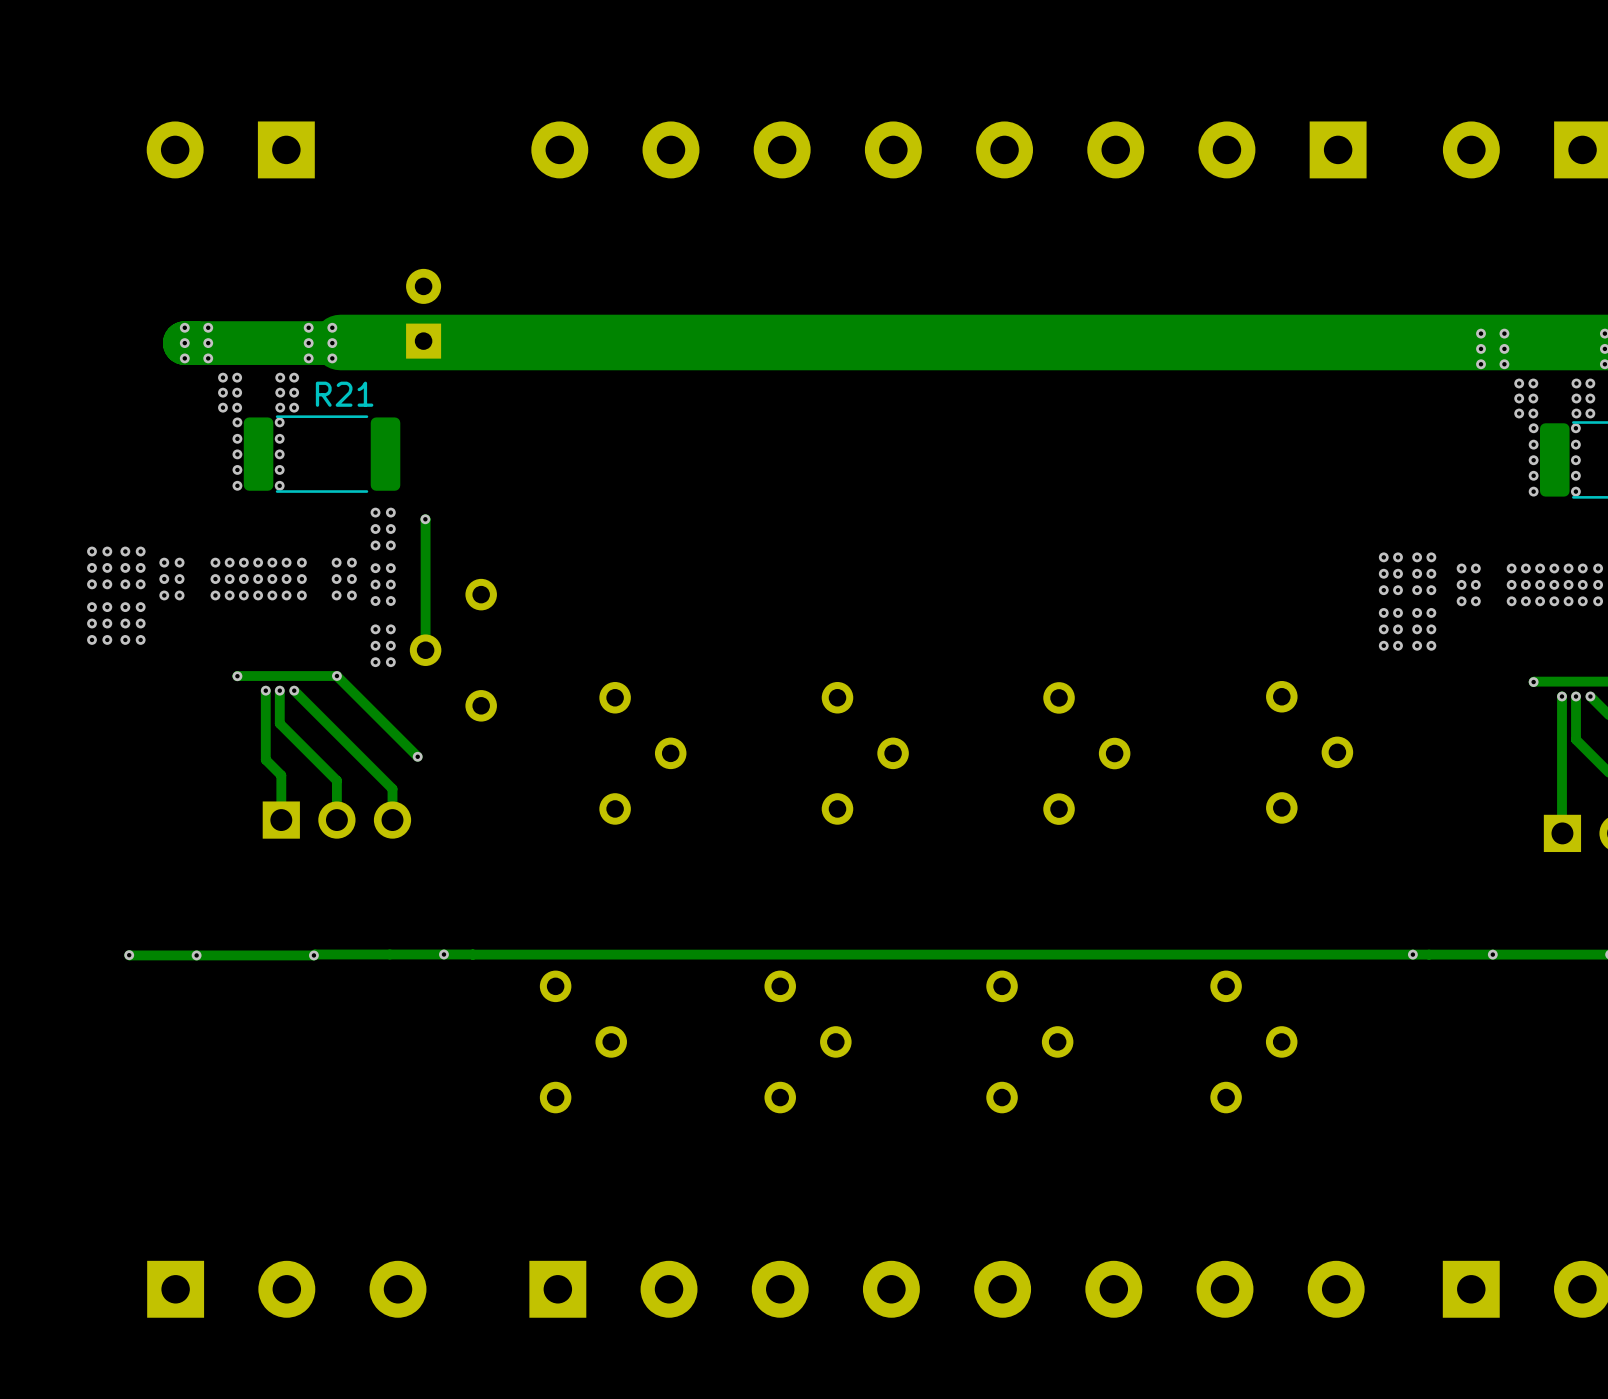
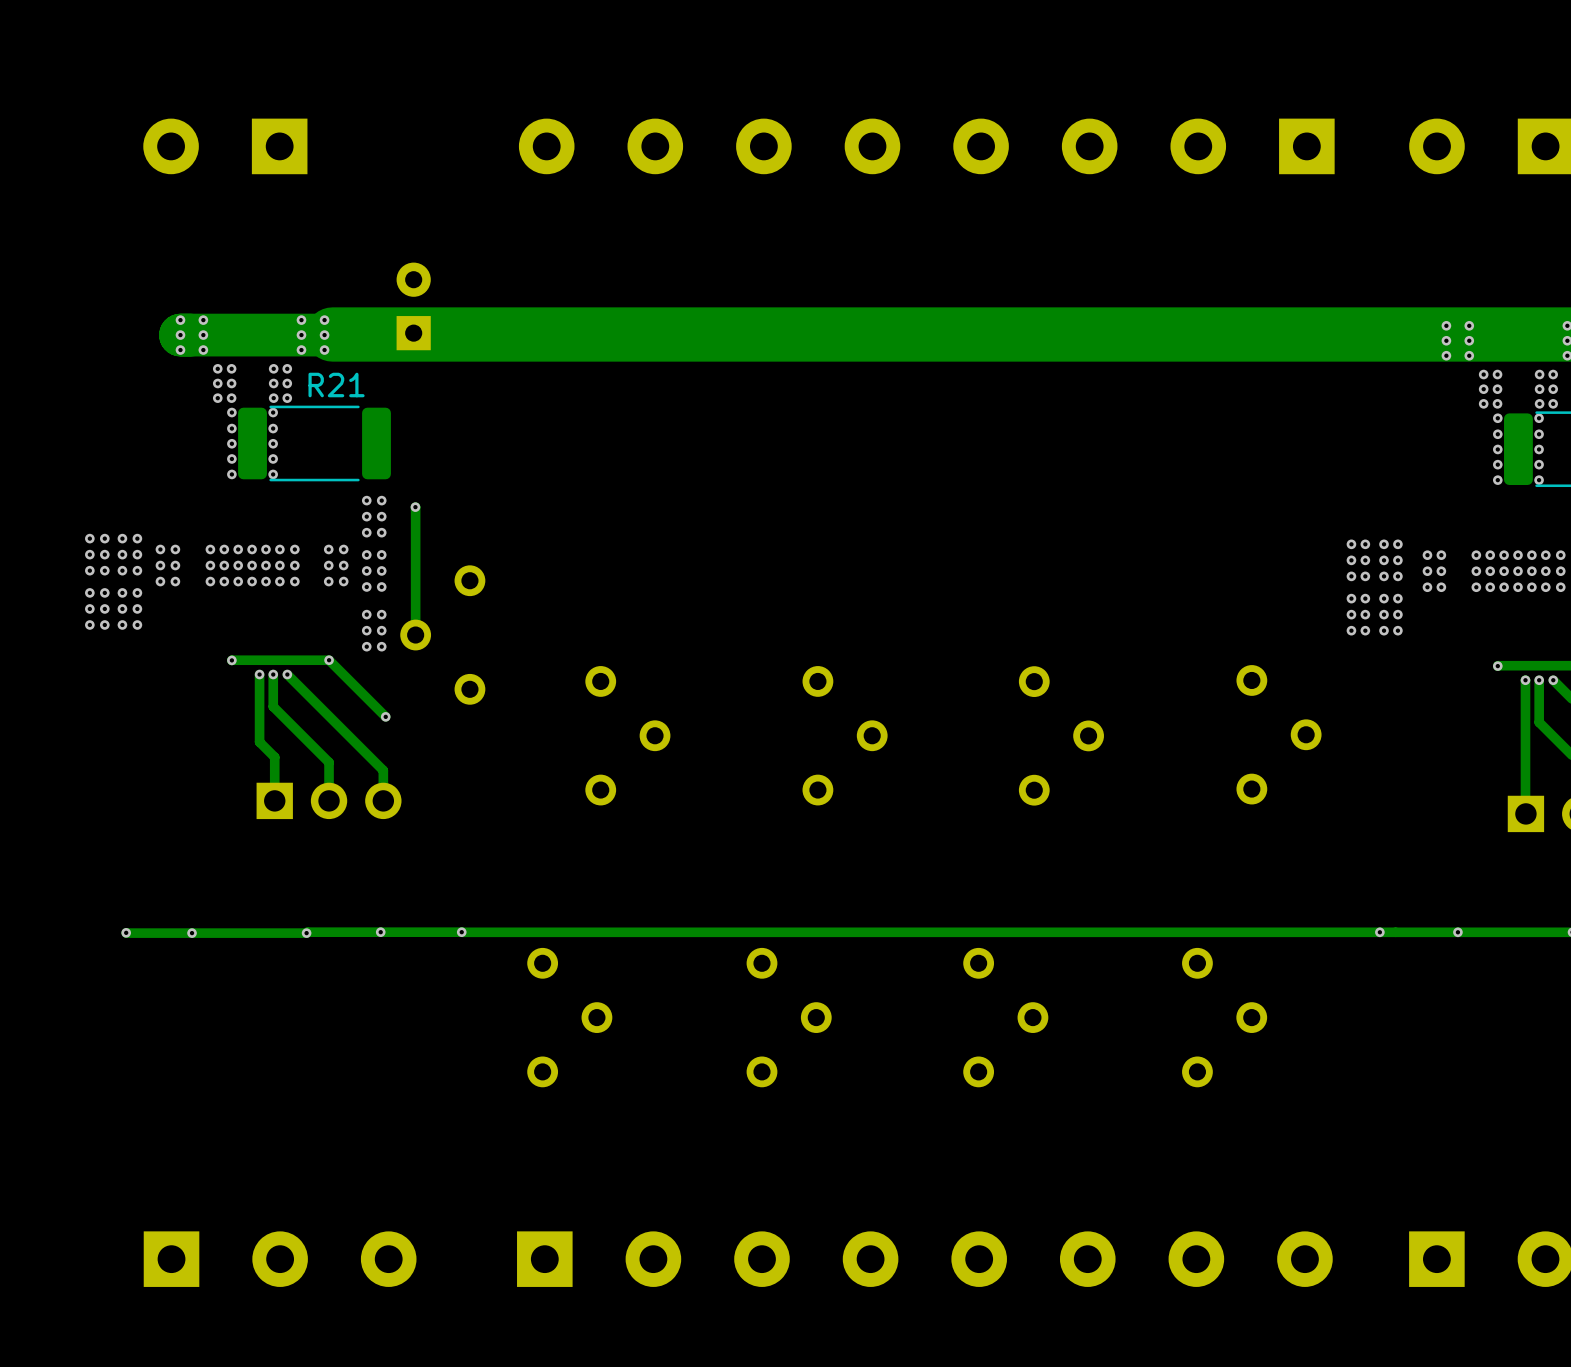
track: (394, 734) (417, 756) -> none
via position: (417, 756) -> (385, 716)
via: none -> (380, 932)
via: (443, 954) -> none
via: none -> (461, 932)

